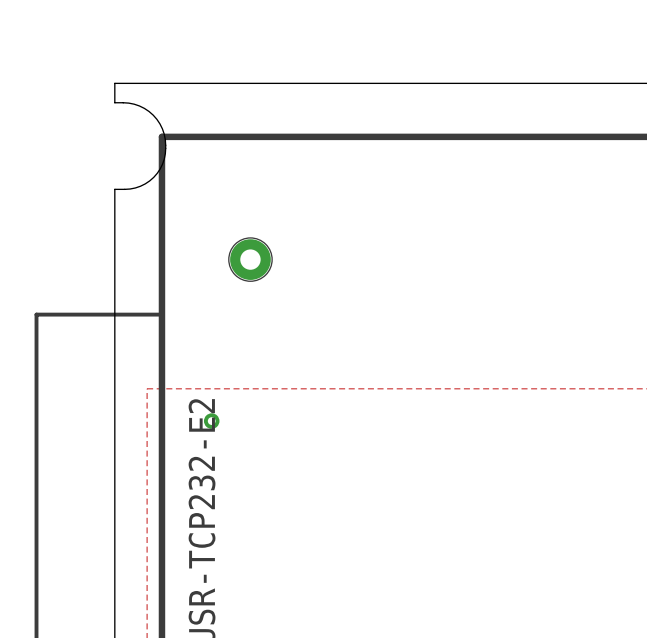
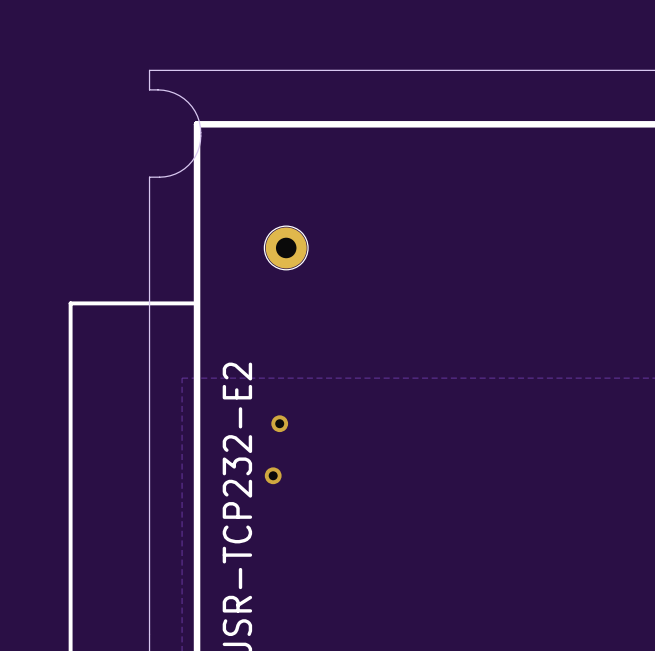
via: (211, 421) -> none
via: none -> (279, 423)
via: none -> (273, 475)

